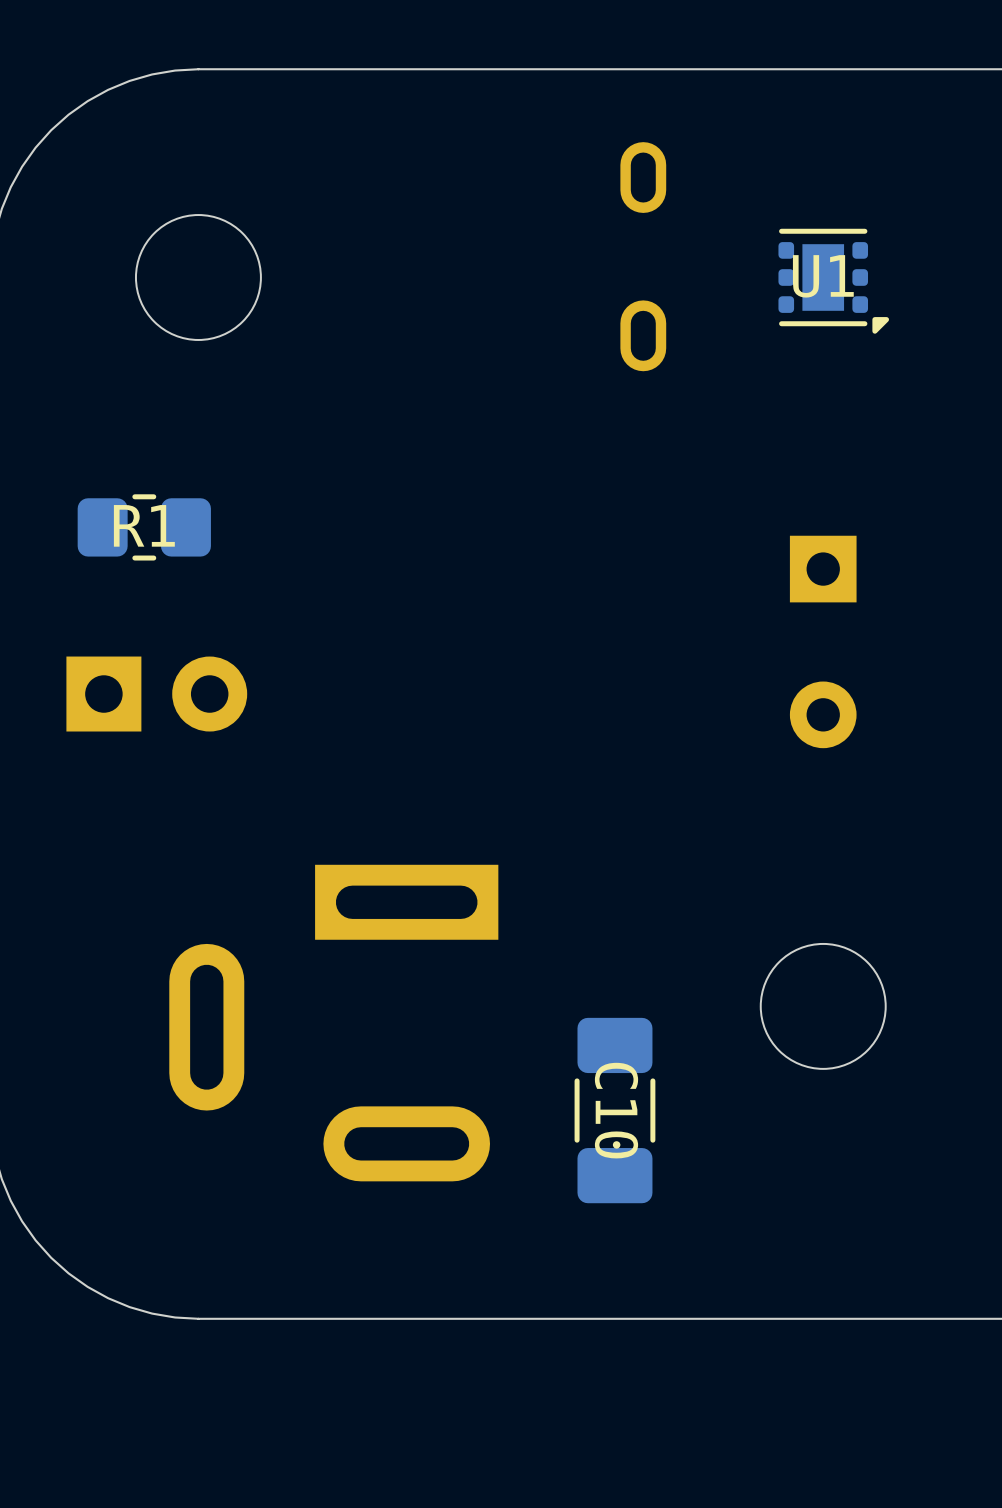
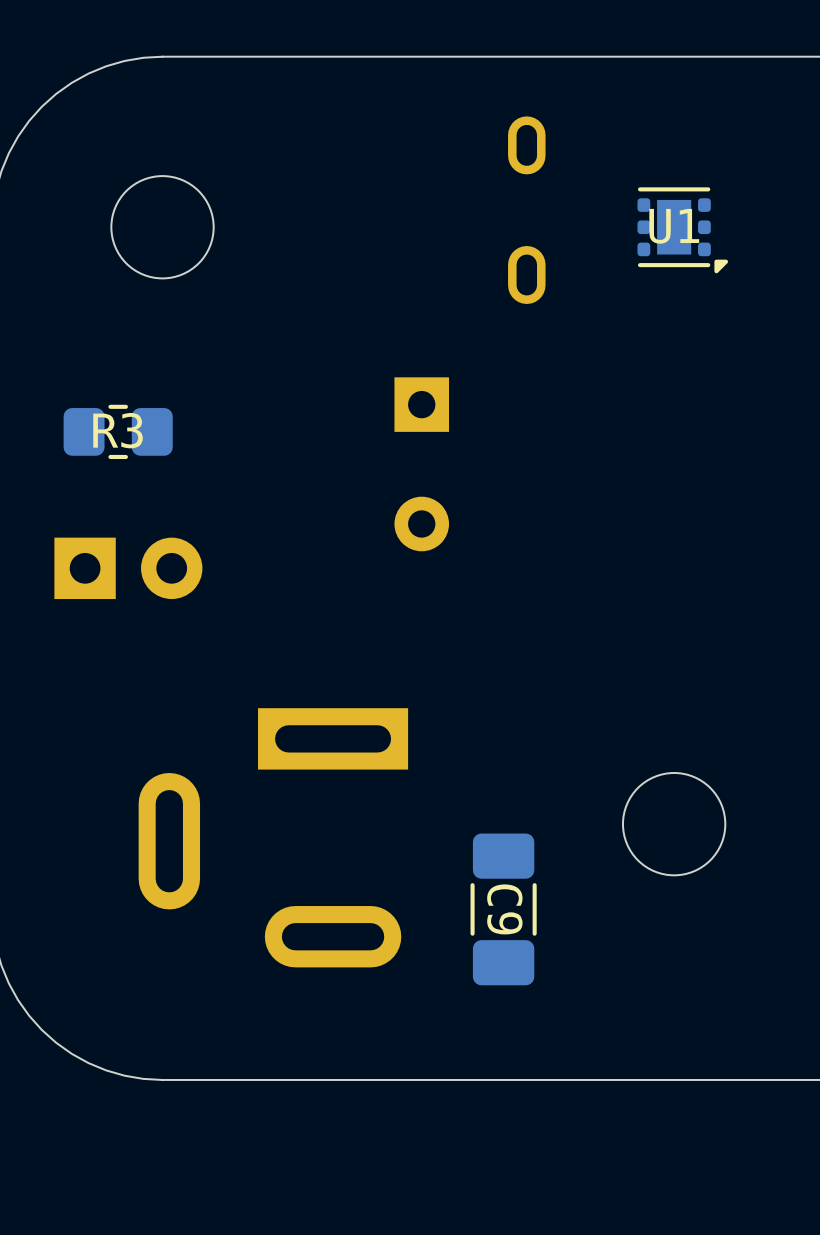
R1 name: R1 (144, 525) -> R3 (118, 430)
part position: (823, 641) -> (421, 464)
C10 name: C10 (616, 1110) -> C9 (504, 909)

